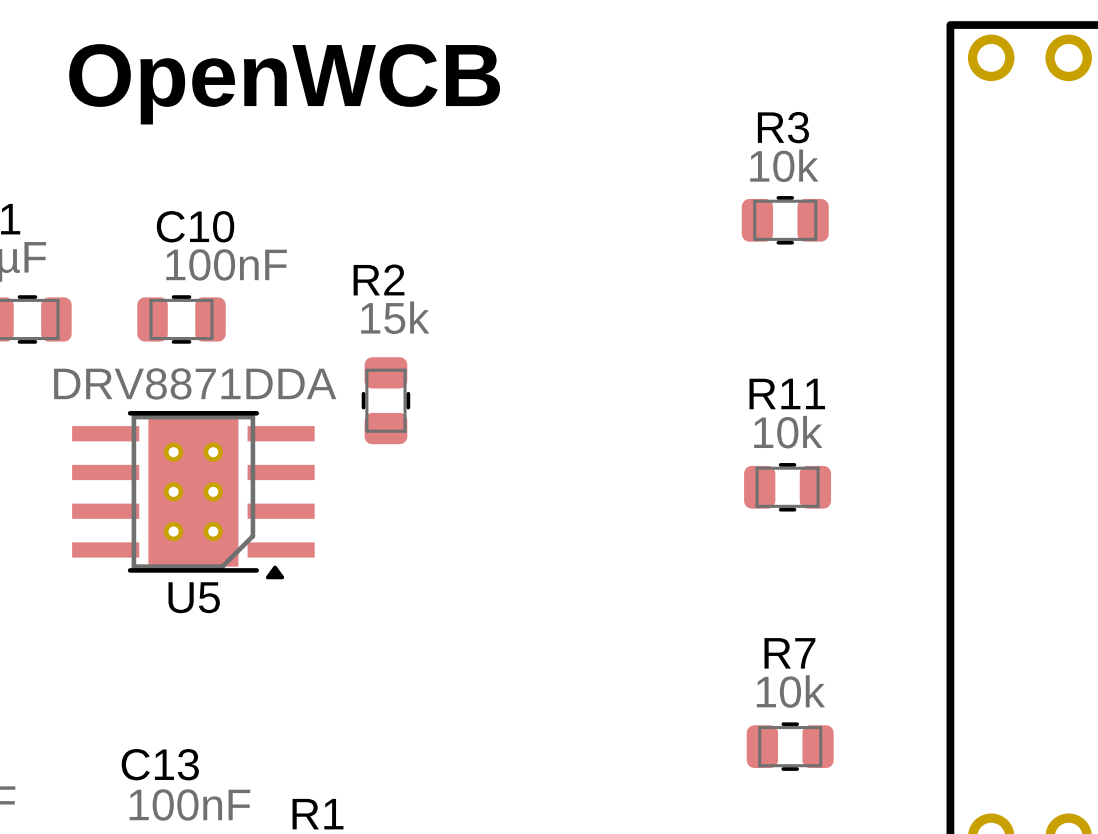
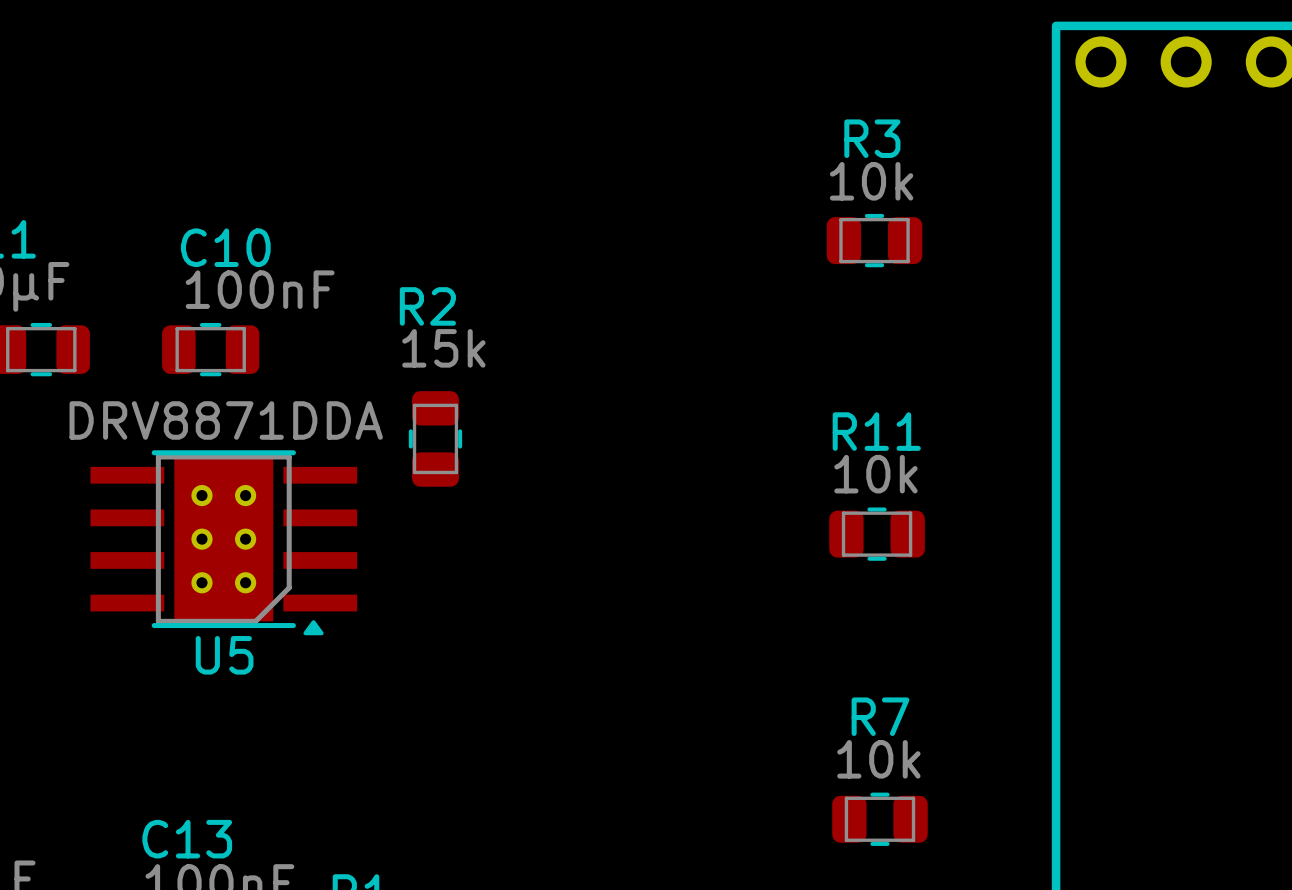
text: OpenWCB (284, 84) -> none

